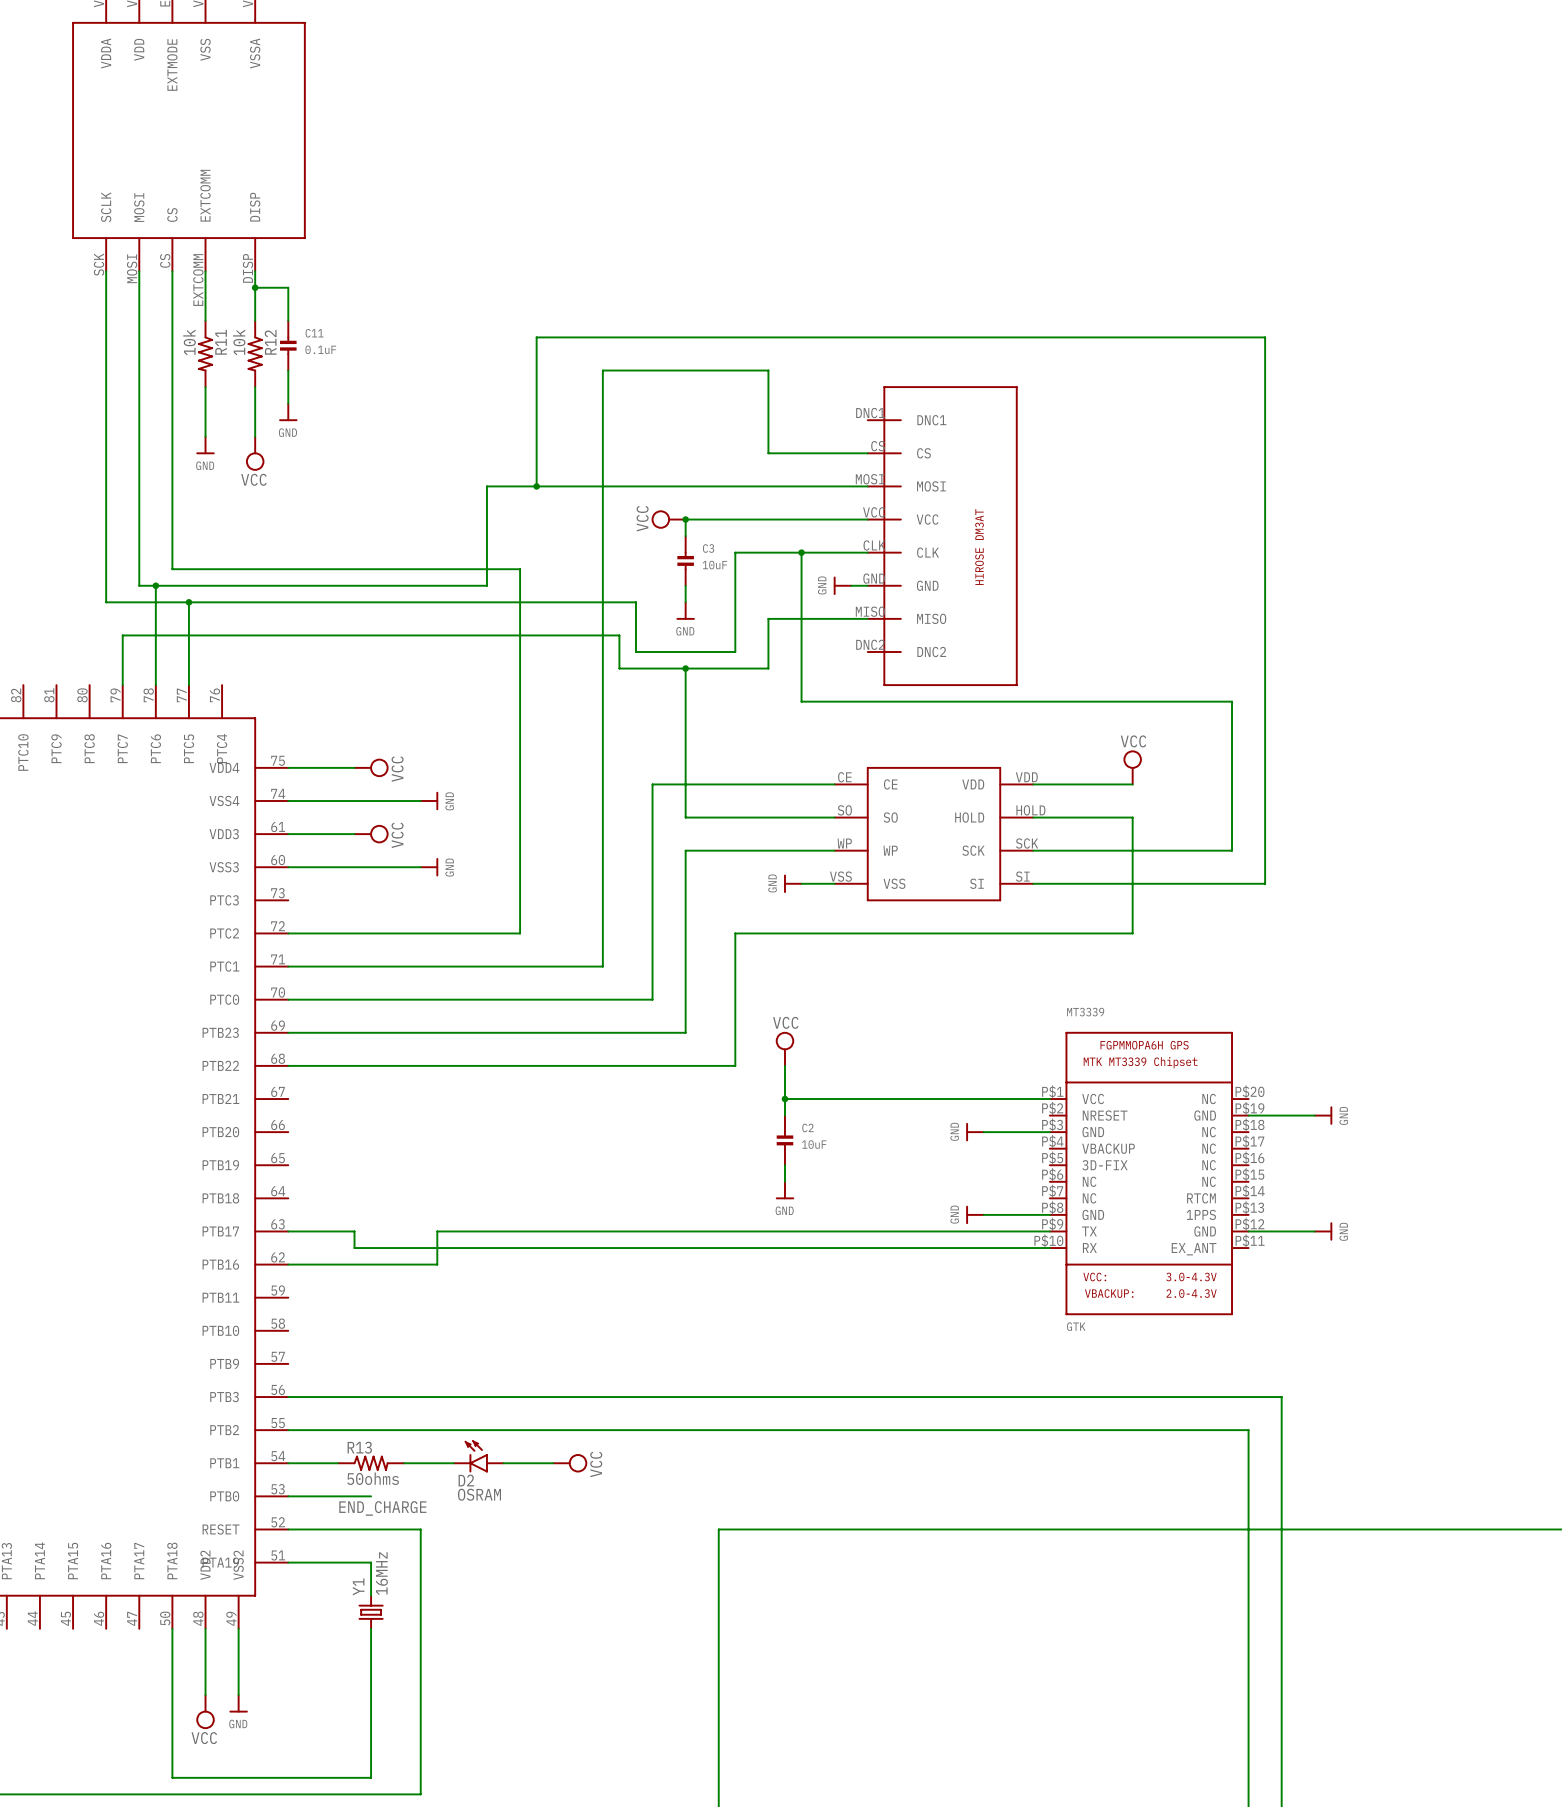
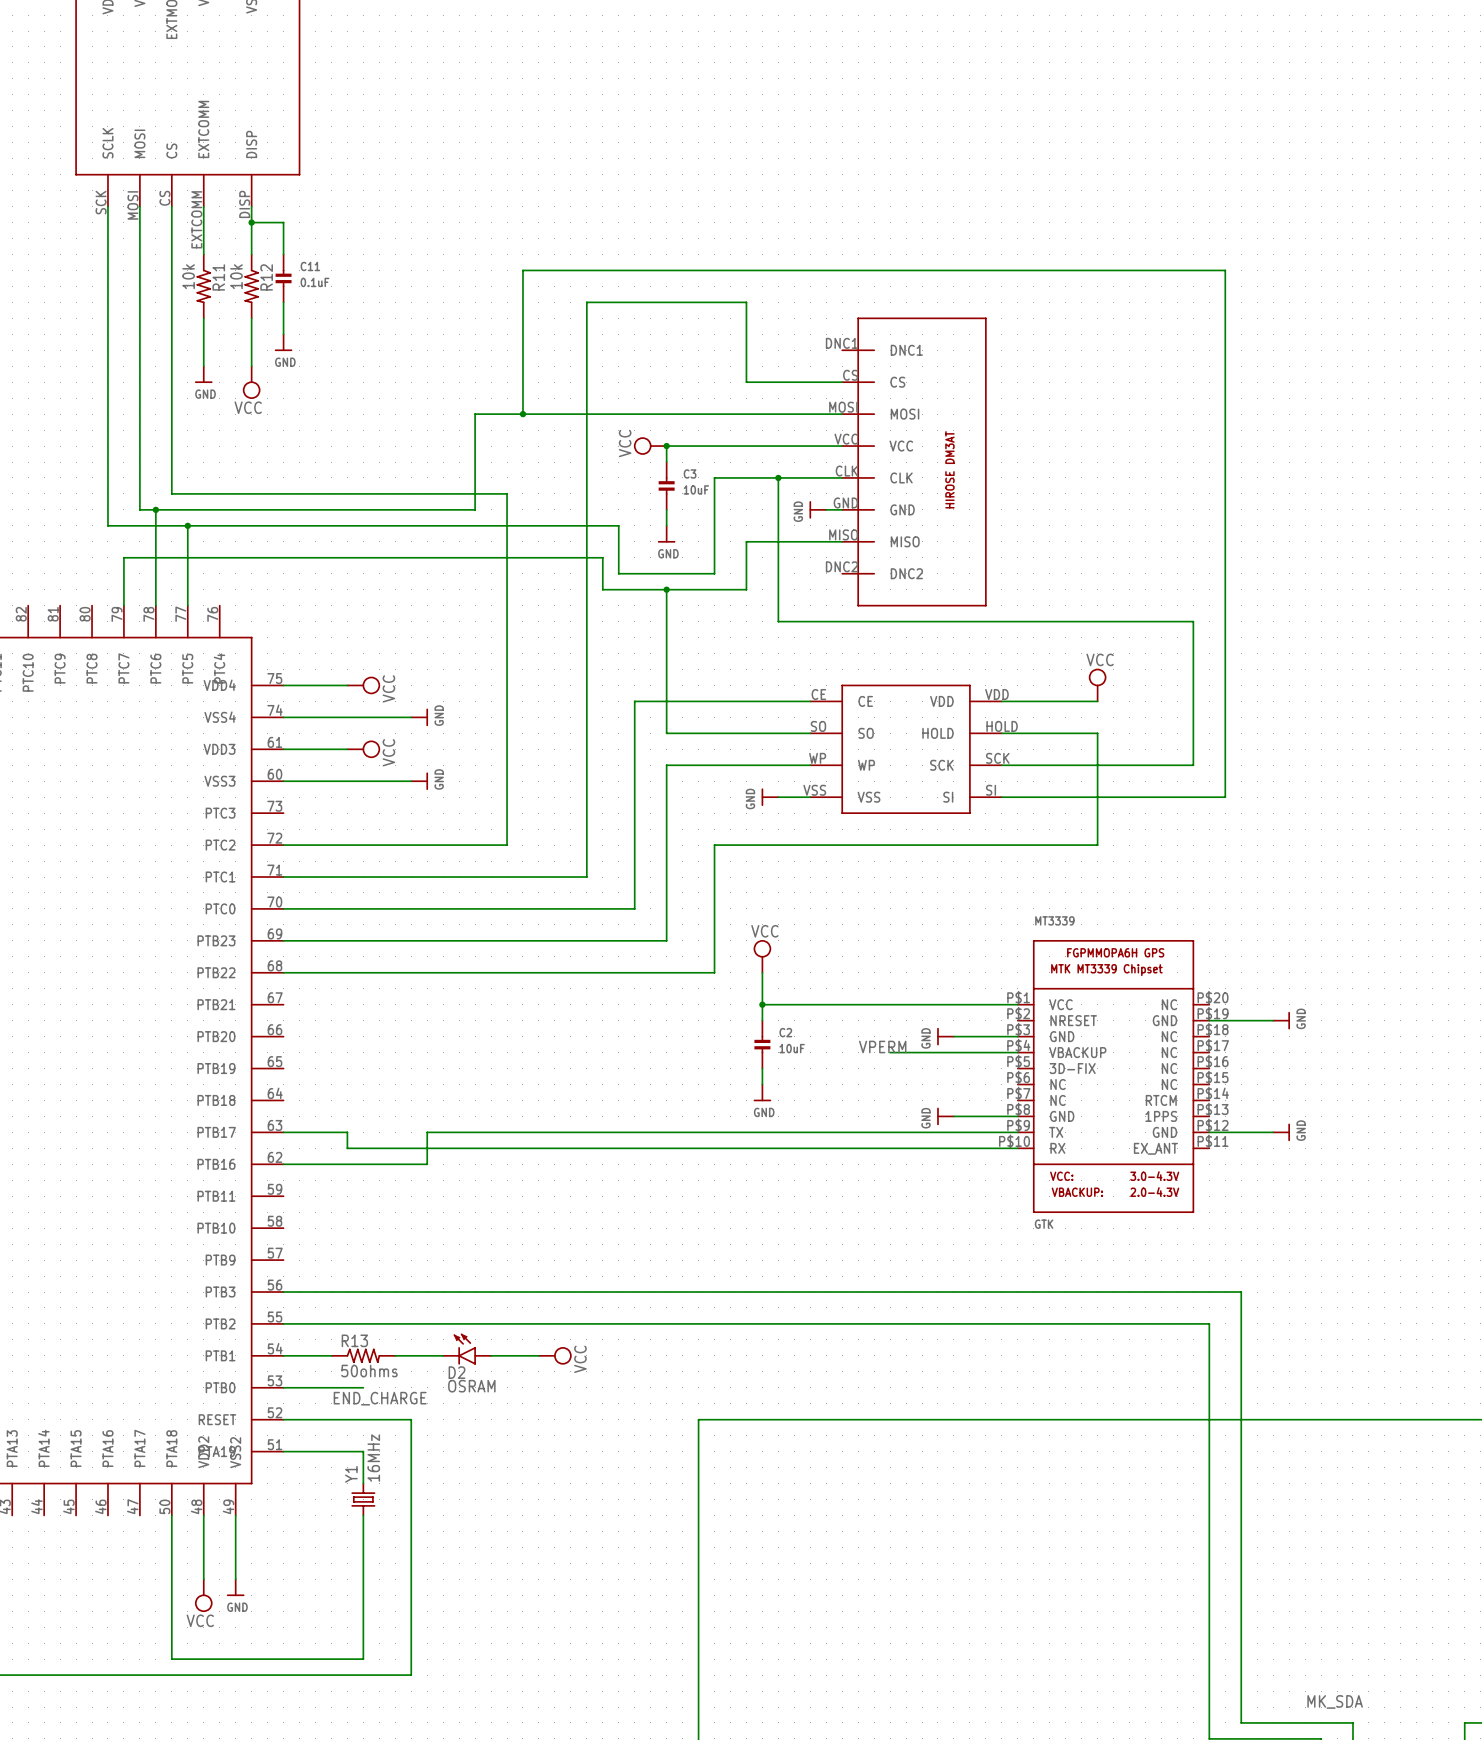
label: none -> VPERM (882, 1046)
wire: none -> (890, 1052) (1017, 1052)

